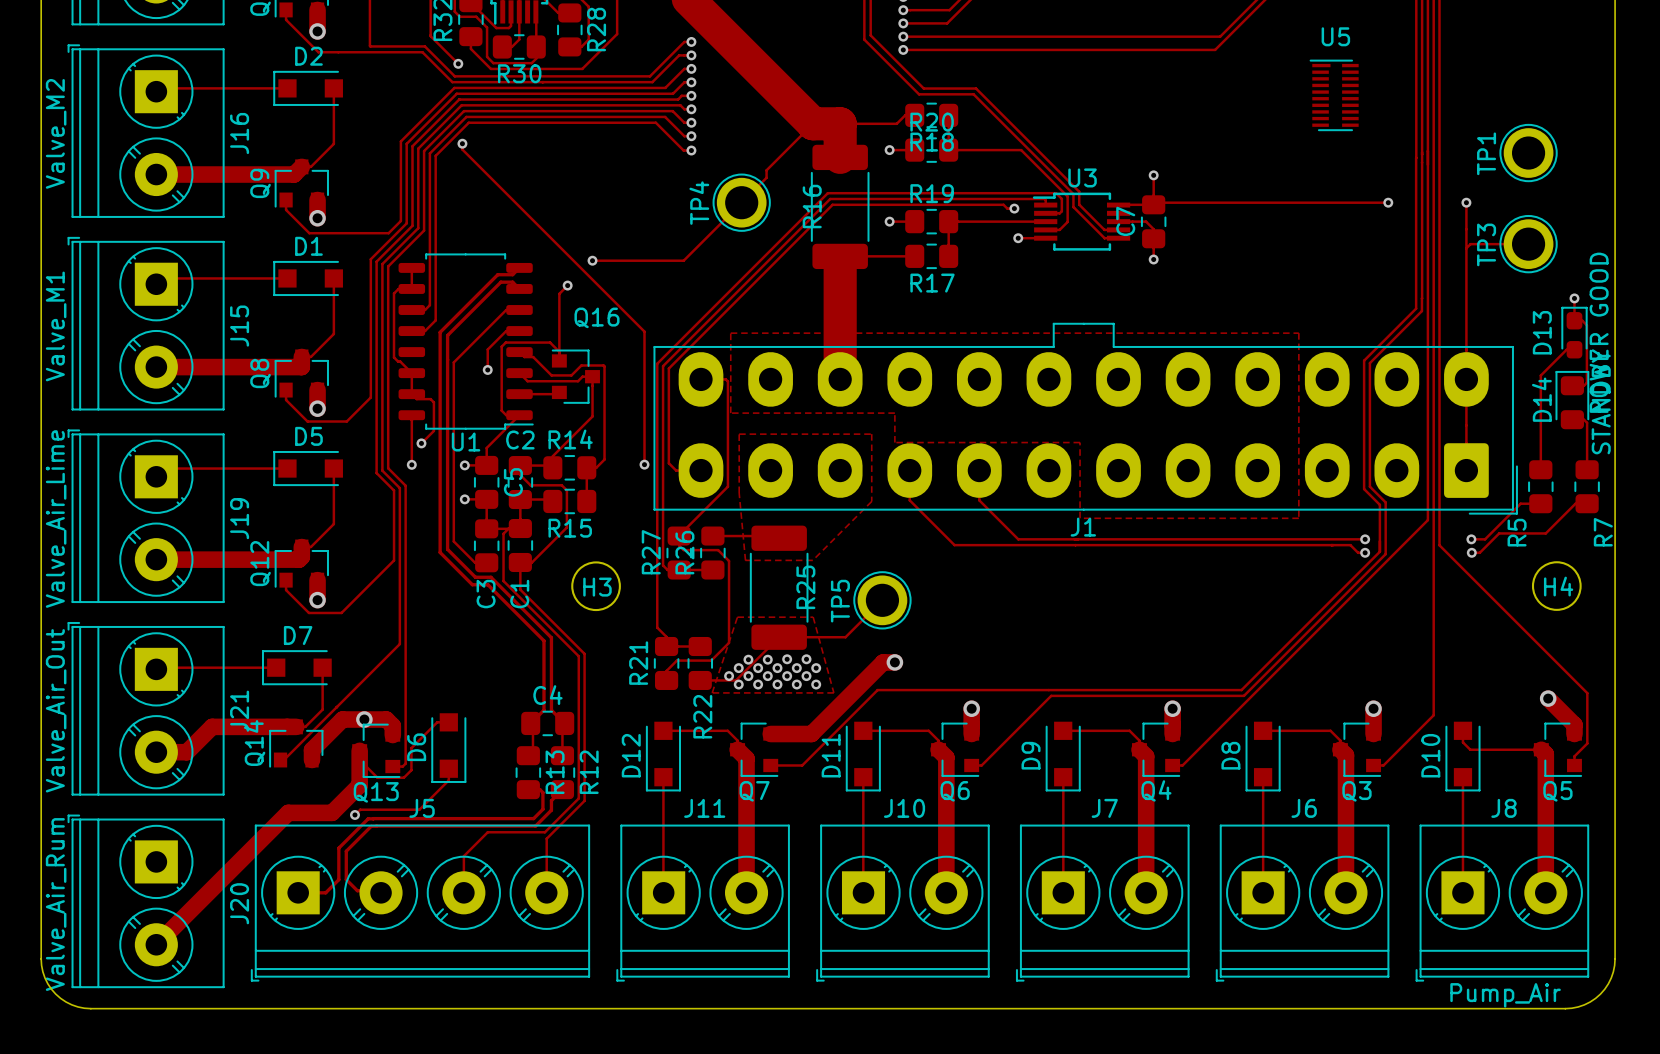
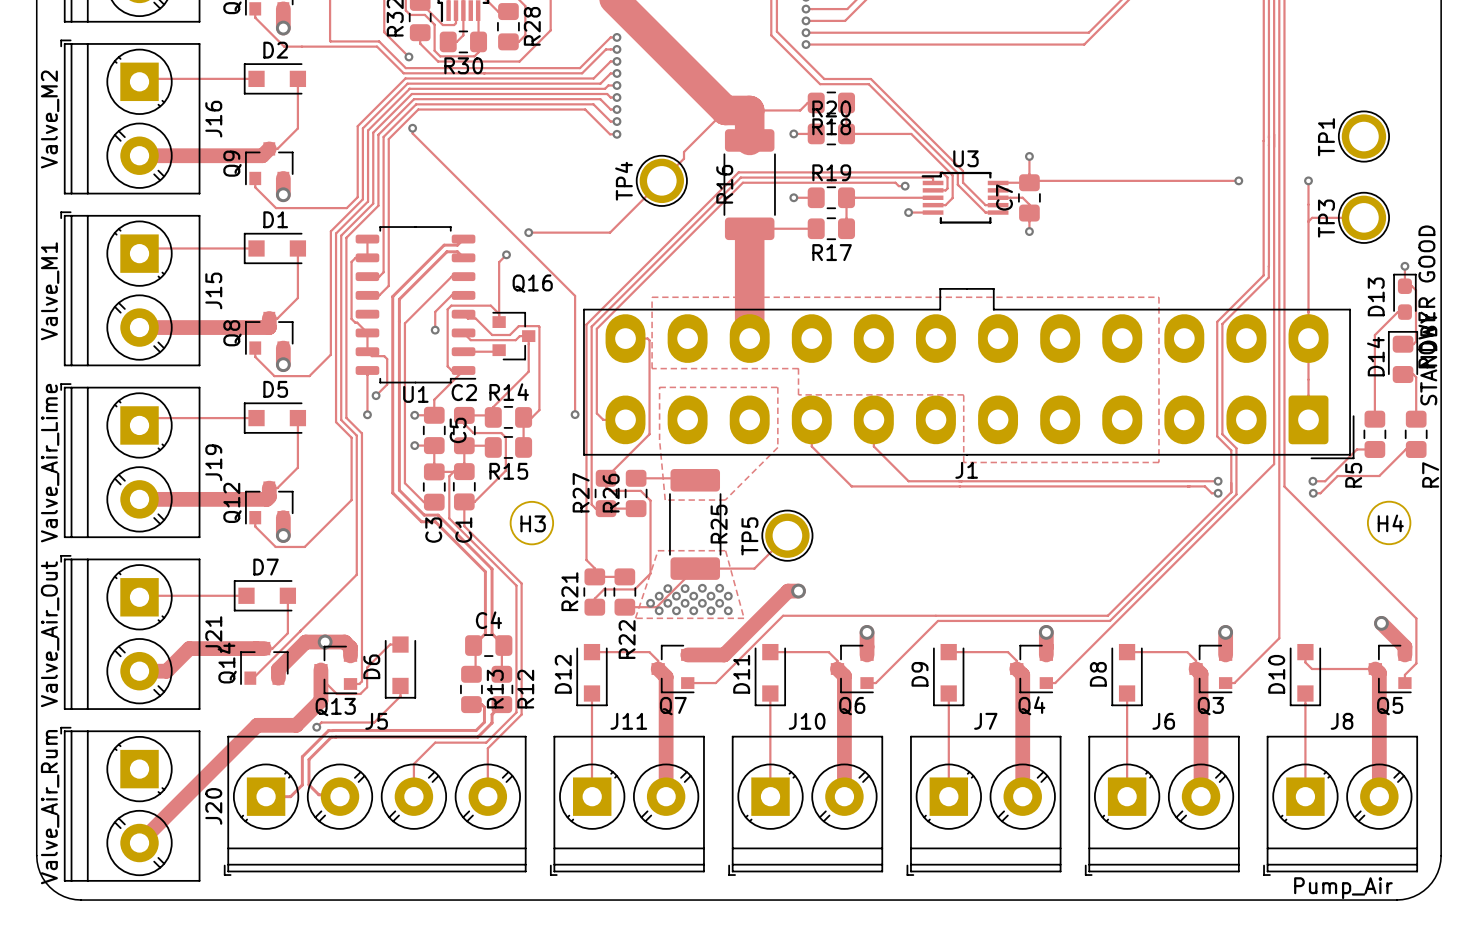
U5: (1334, 95) -> none

